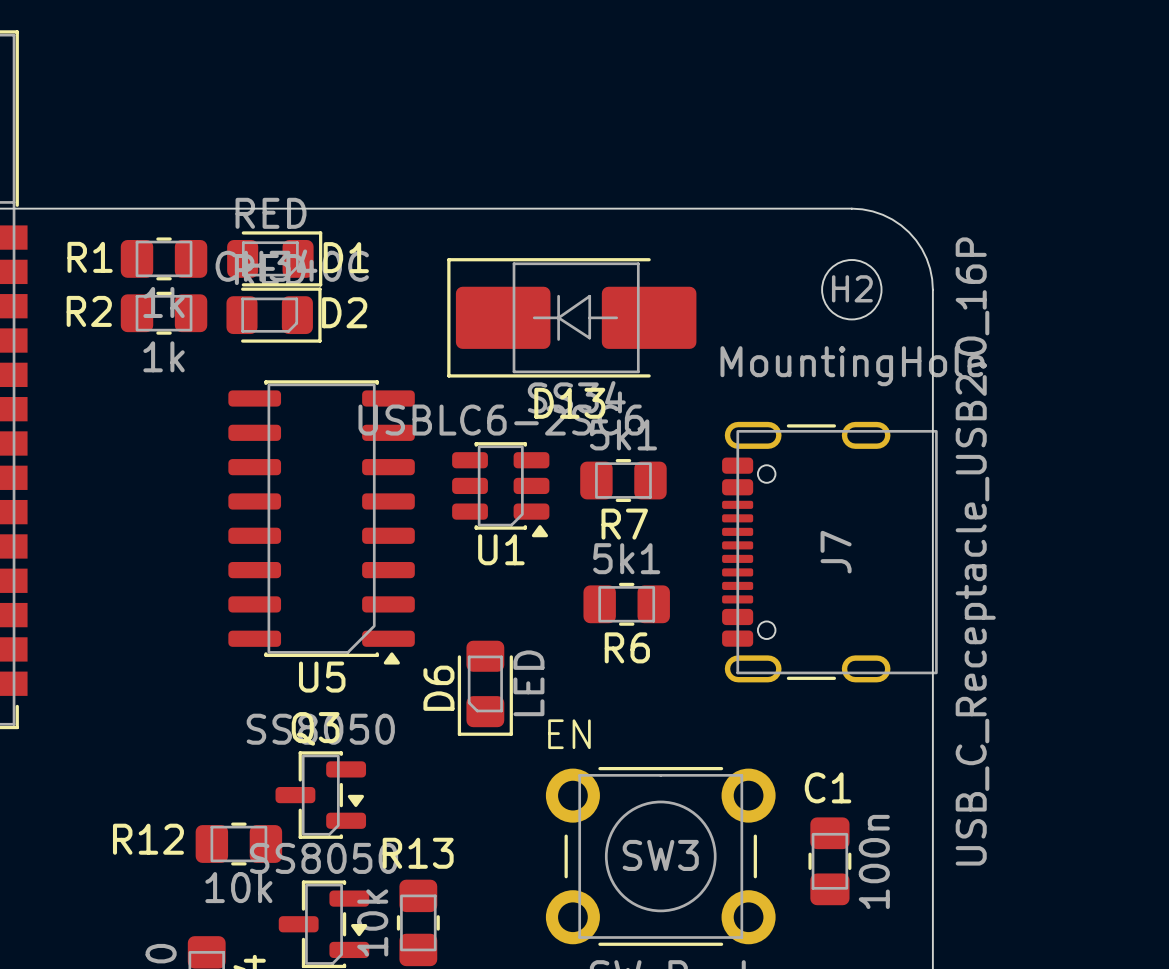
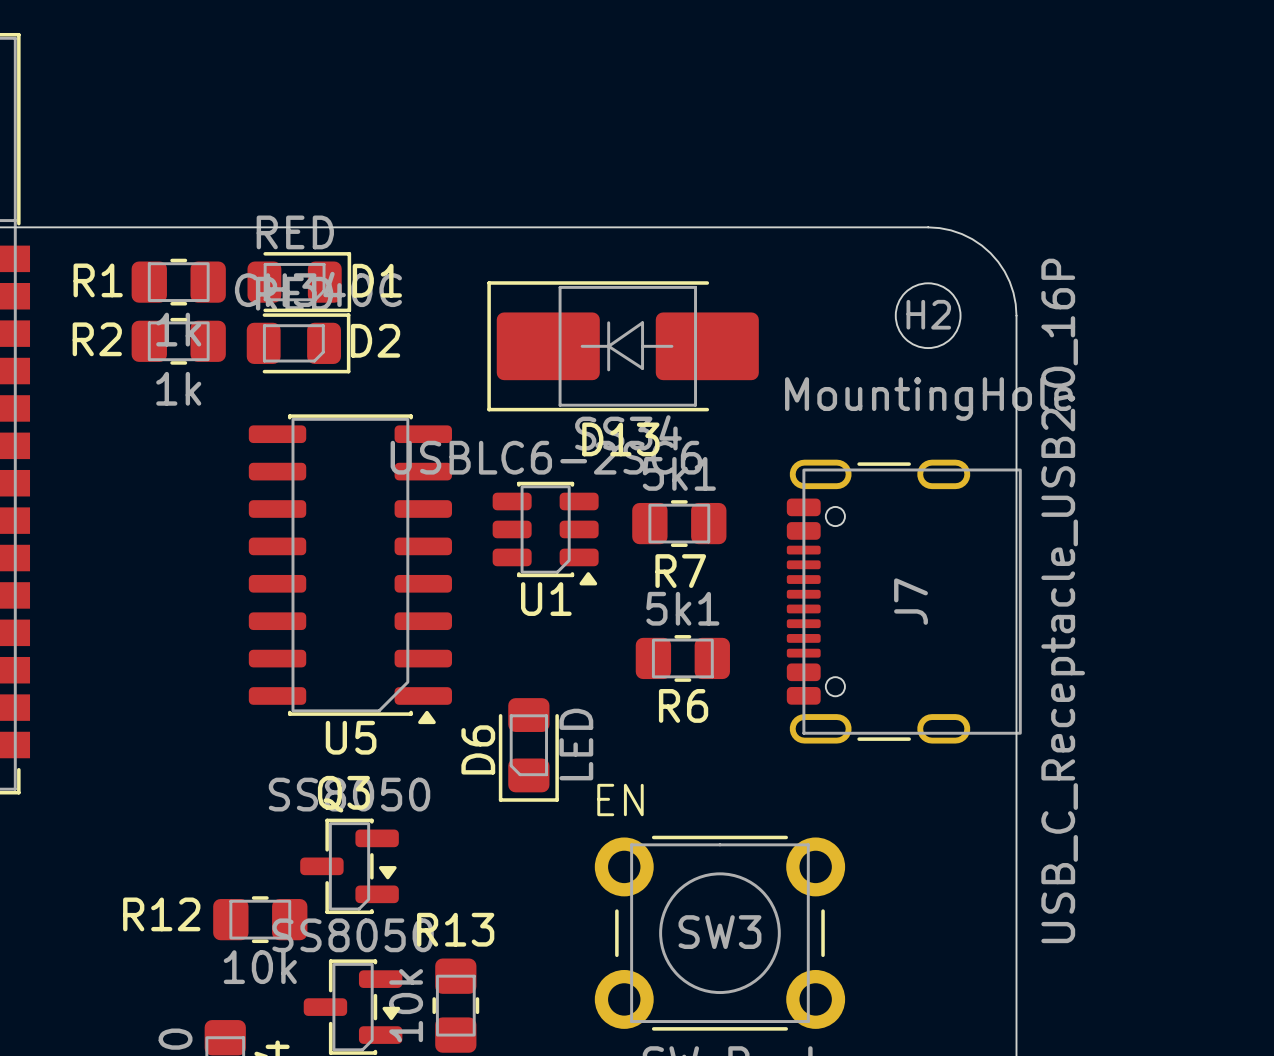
C1: 100n (829, 861) -> none

